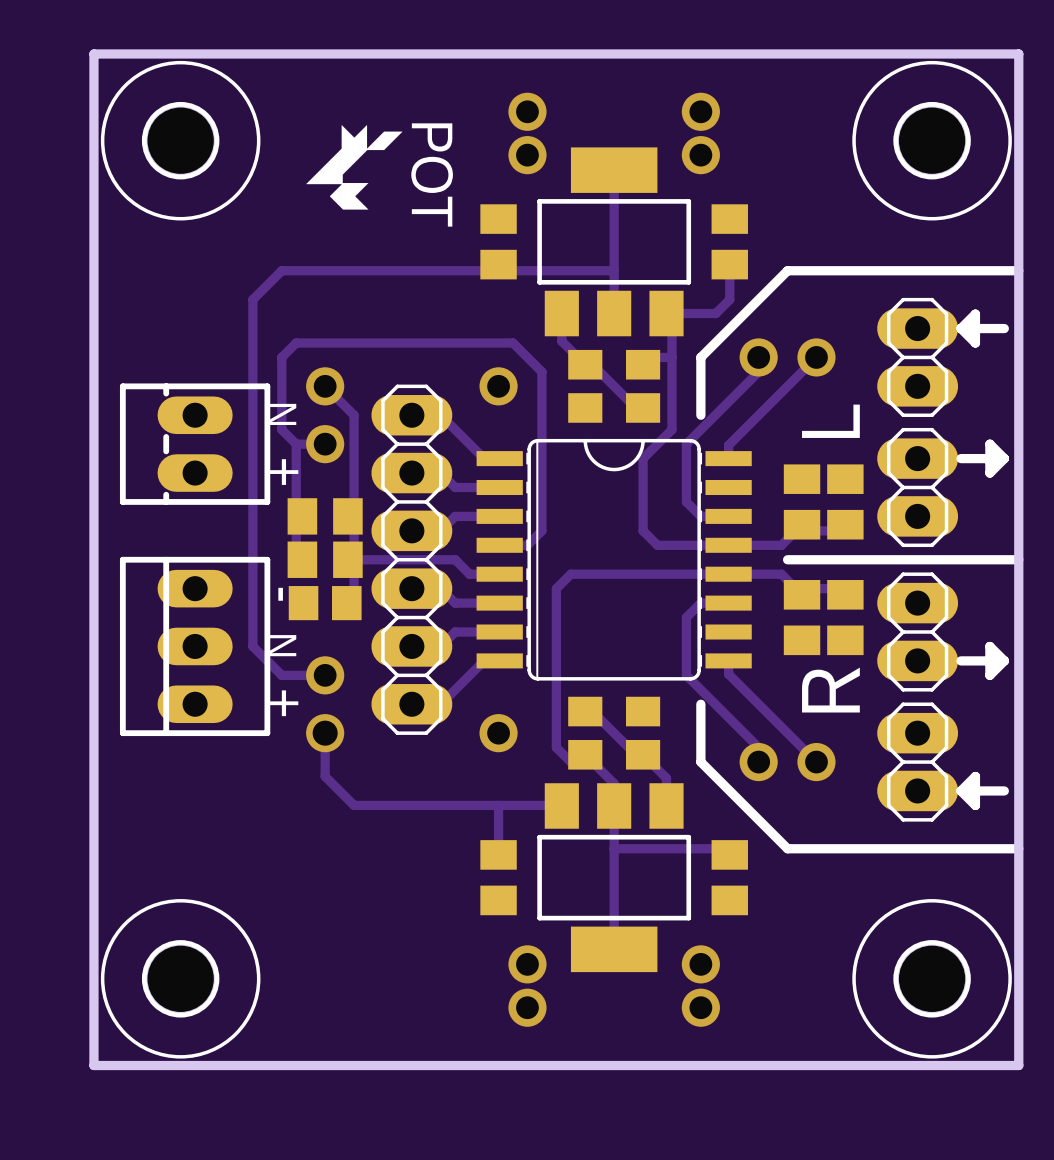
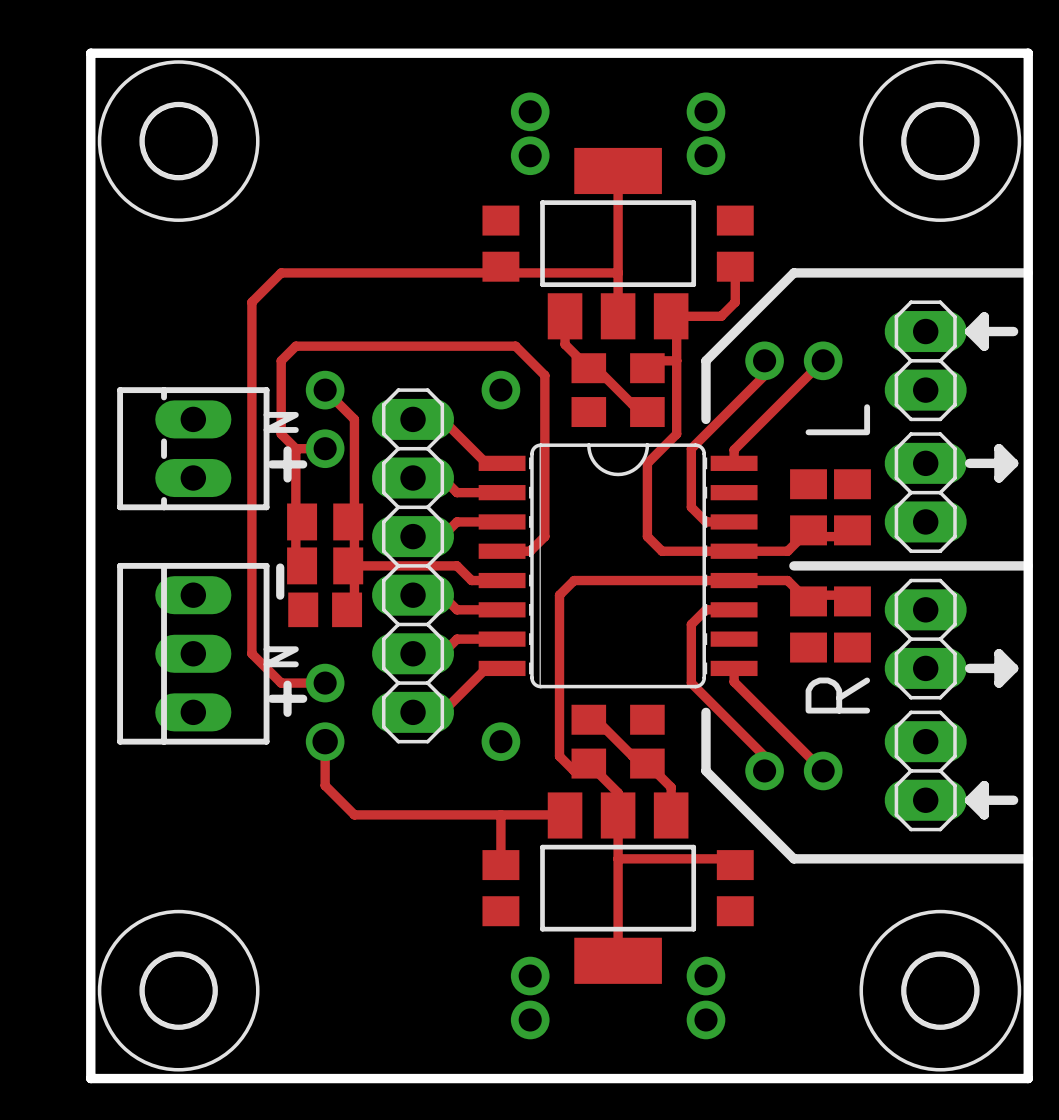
drawing: [306, 125, 403, 210] -> none
text: POT (432, 174) -> none

